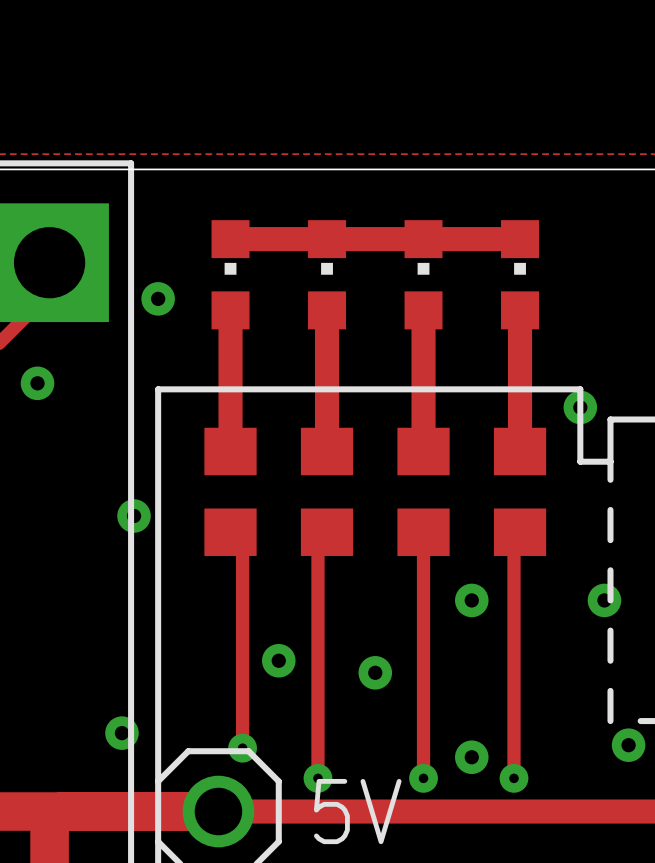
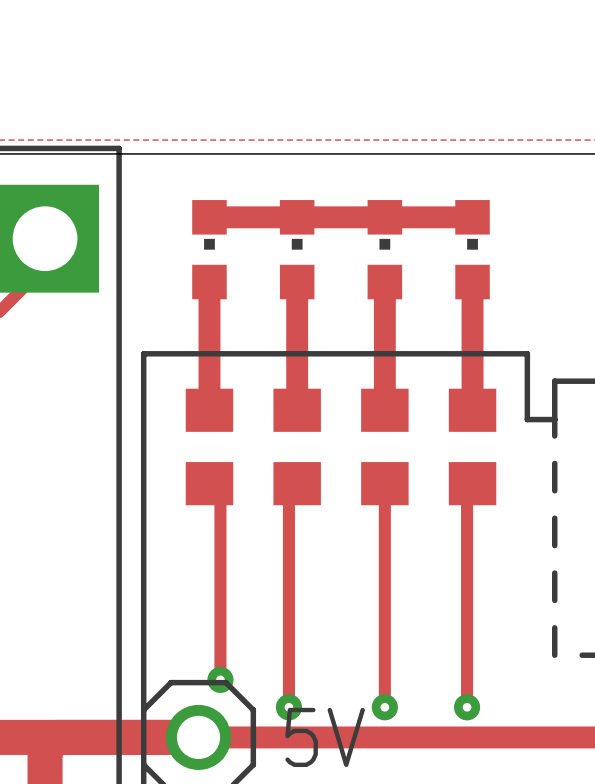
via: (158, 298) -> none
via: (37, 383) -> none
via: (580, 407) -> none
via: (134, 516) -> none
via: (471, 600) -> none
via: (604, 600) -> none
via: (278, 660) -> none
via: (375, 672) -> none
via: (121, 733) -> none
via: (628, 745) -> none
via: (471, 757) -> none

